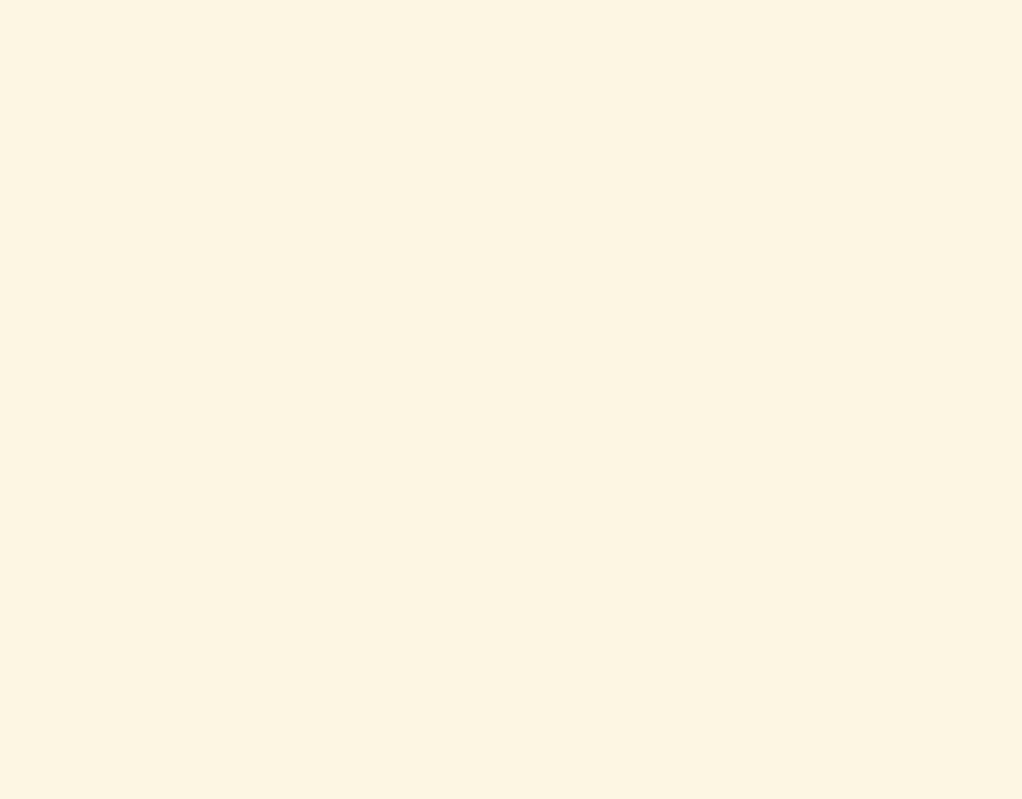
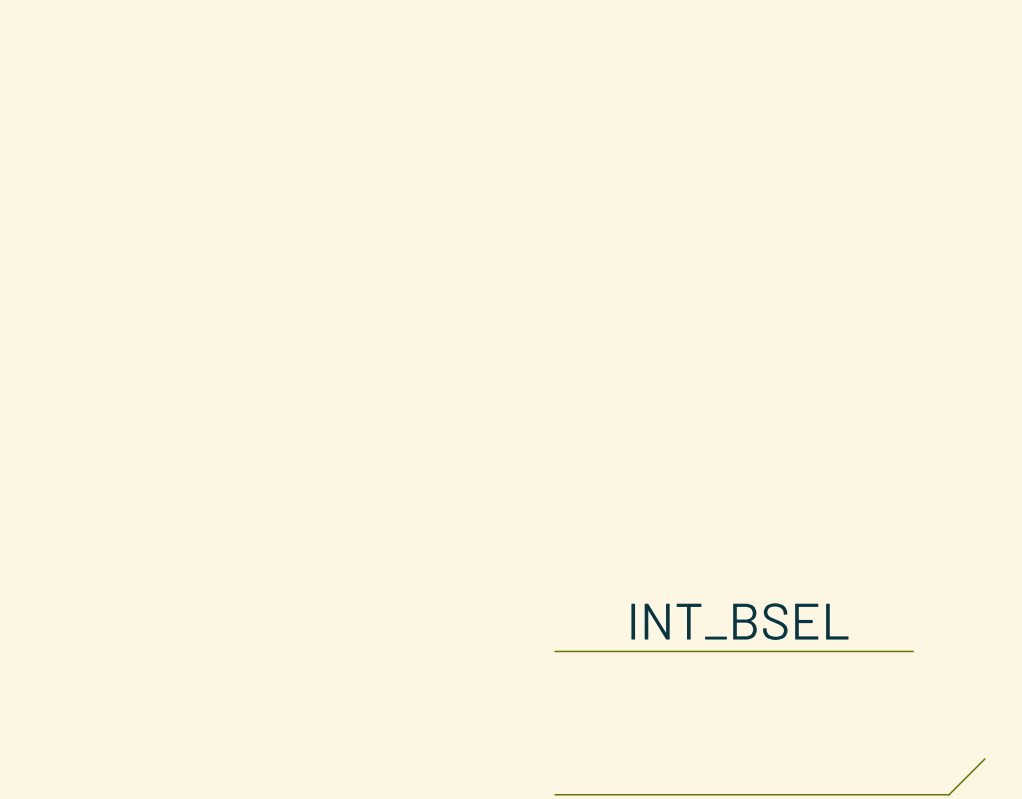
label: none -> INT_BSEL (739, 621)
wire: none -> (554, 651) (913, 651)
wire: none -> (984, 758) (949, 794) (554, 794)

